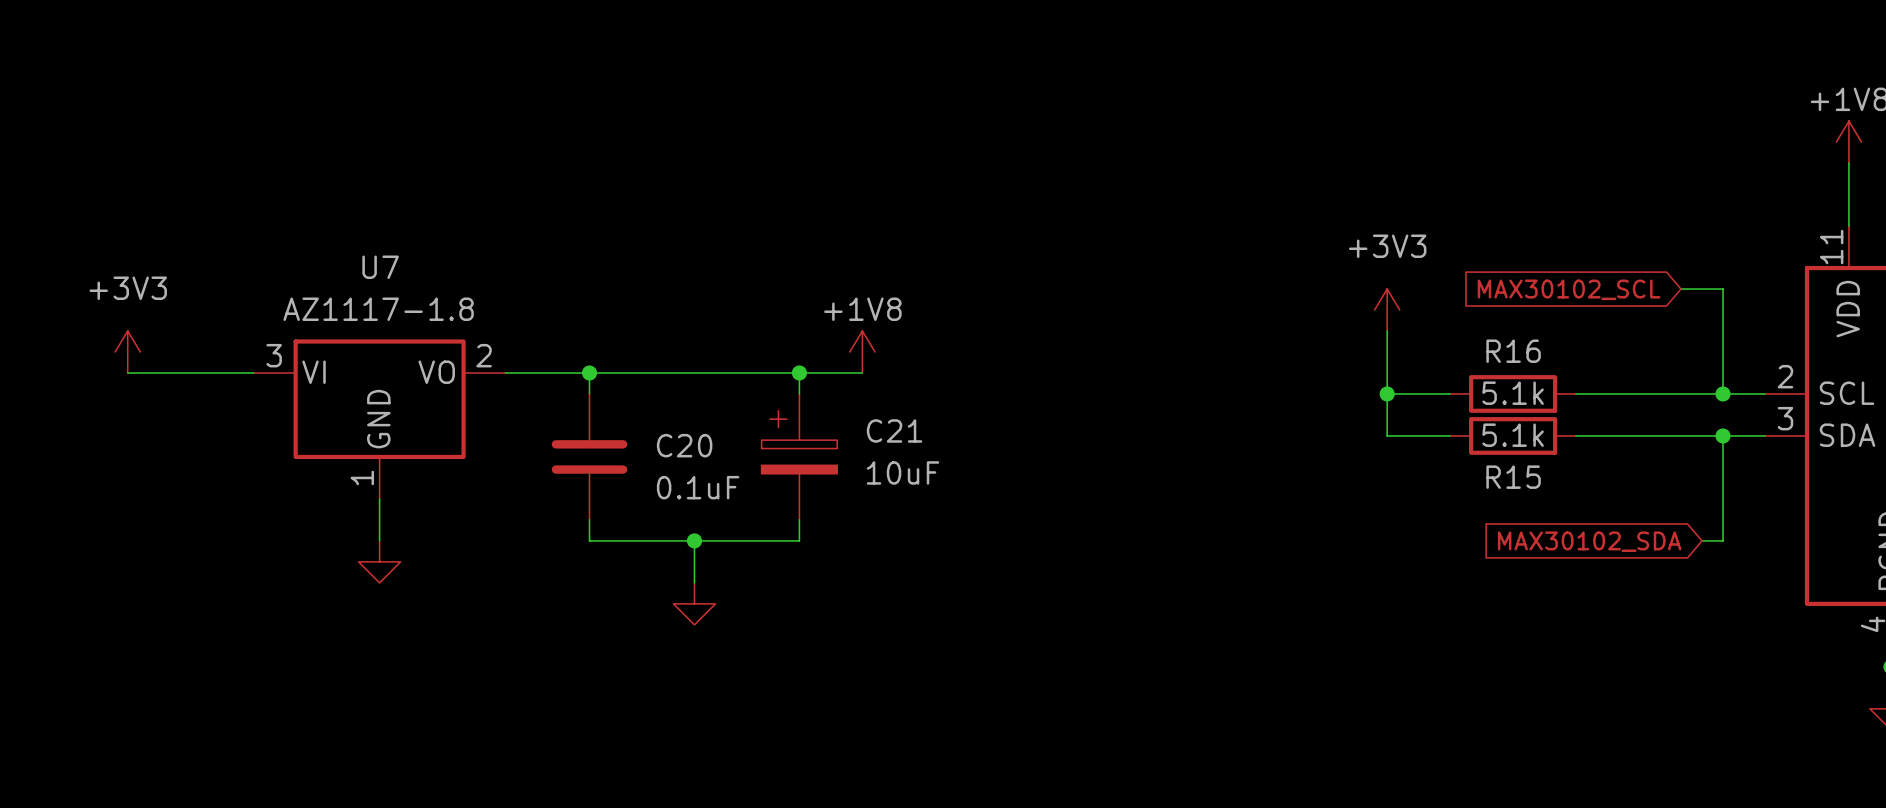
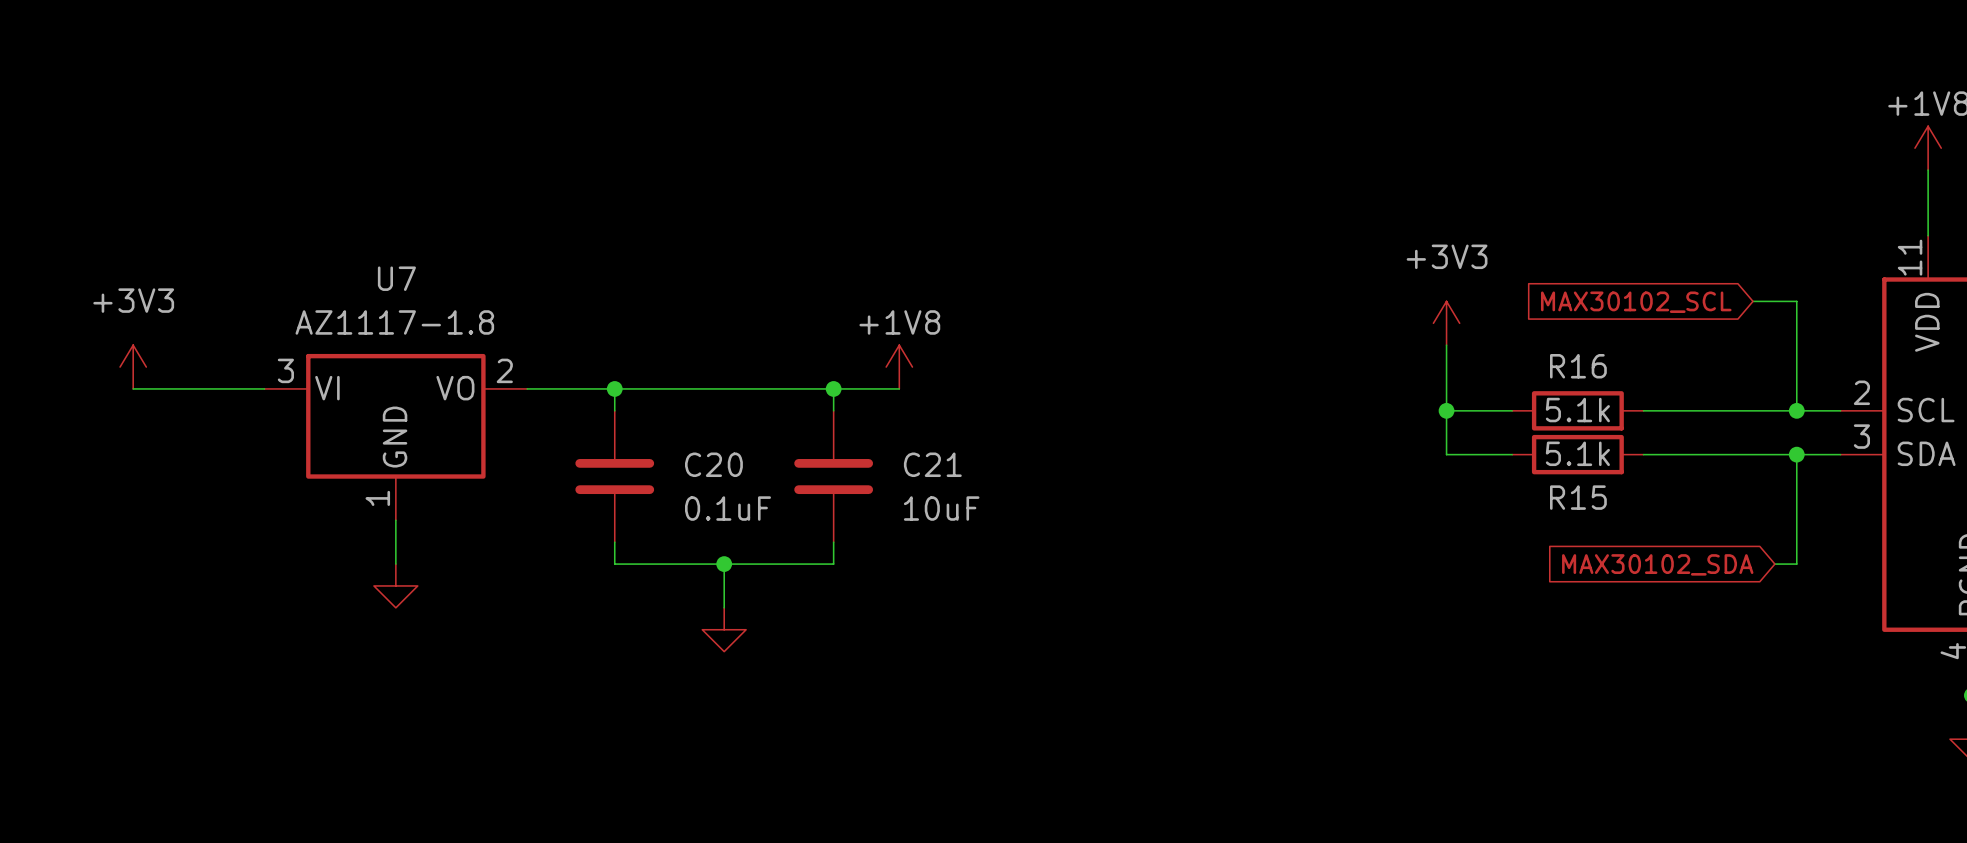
C21 symbol: [761, 393, 838, 520] -> [794, 410, 874, 543]

